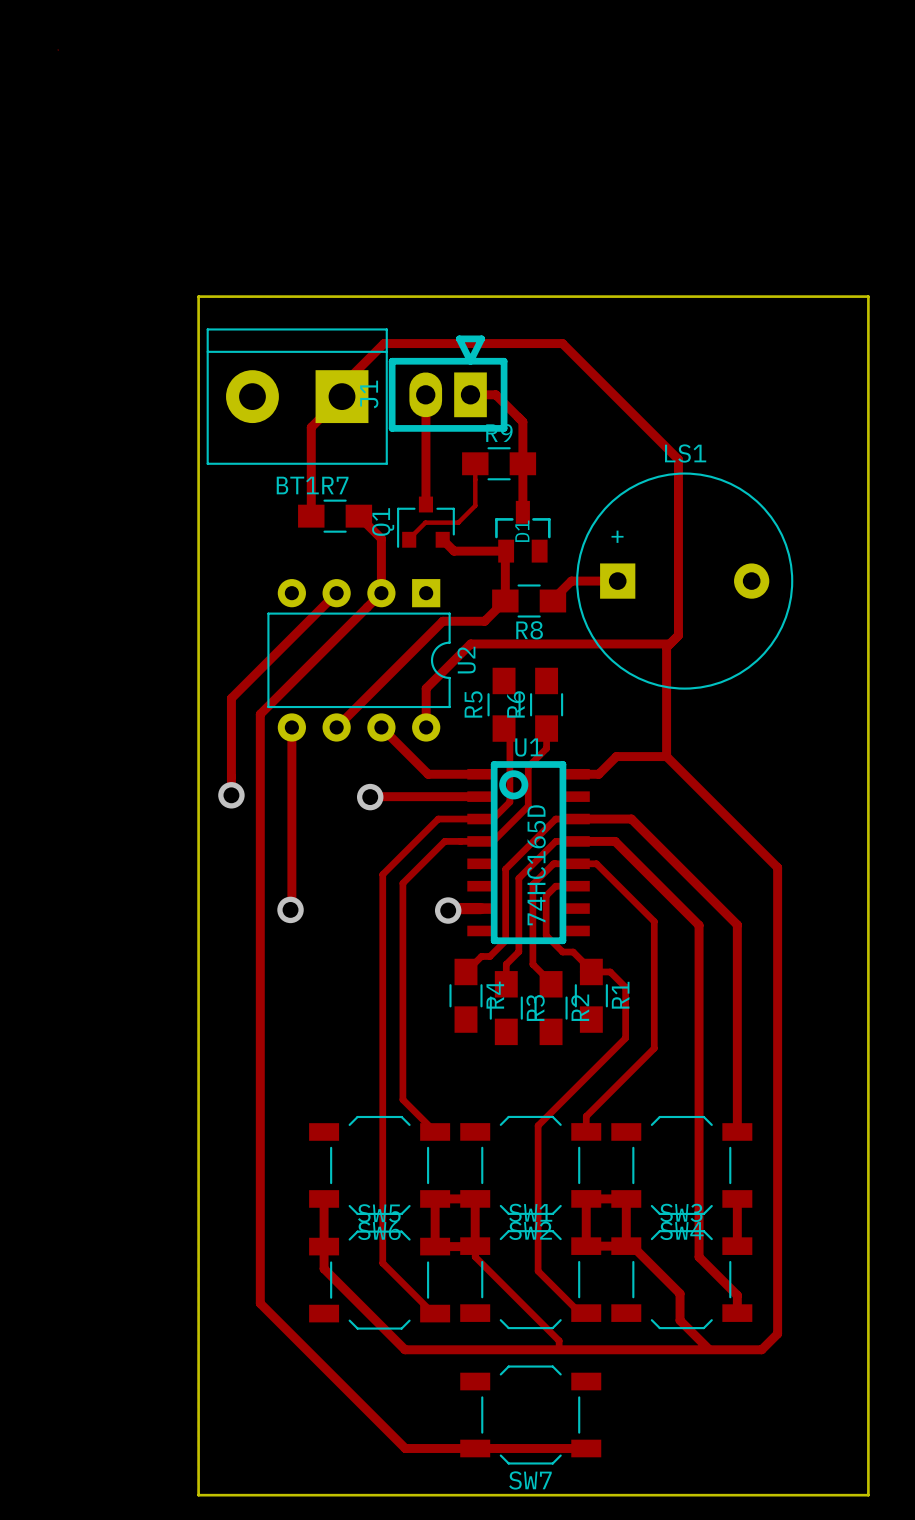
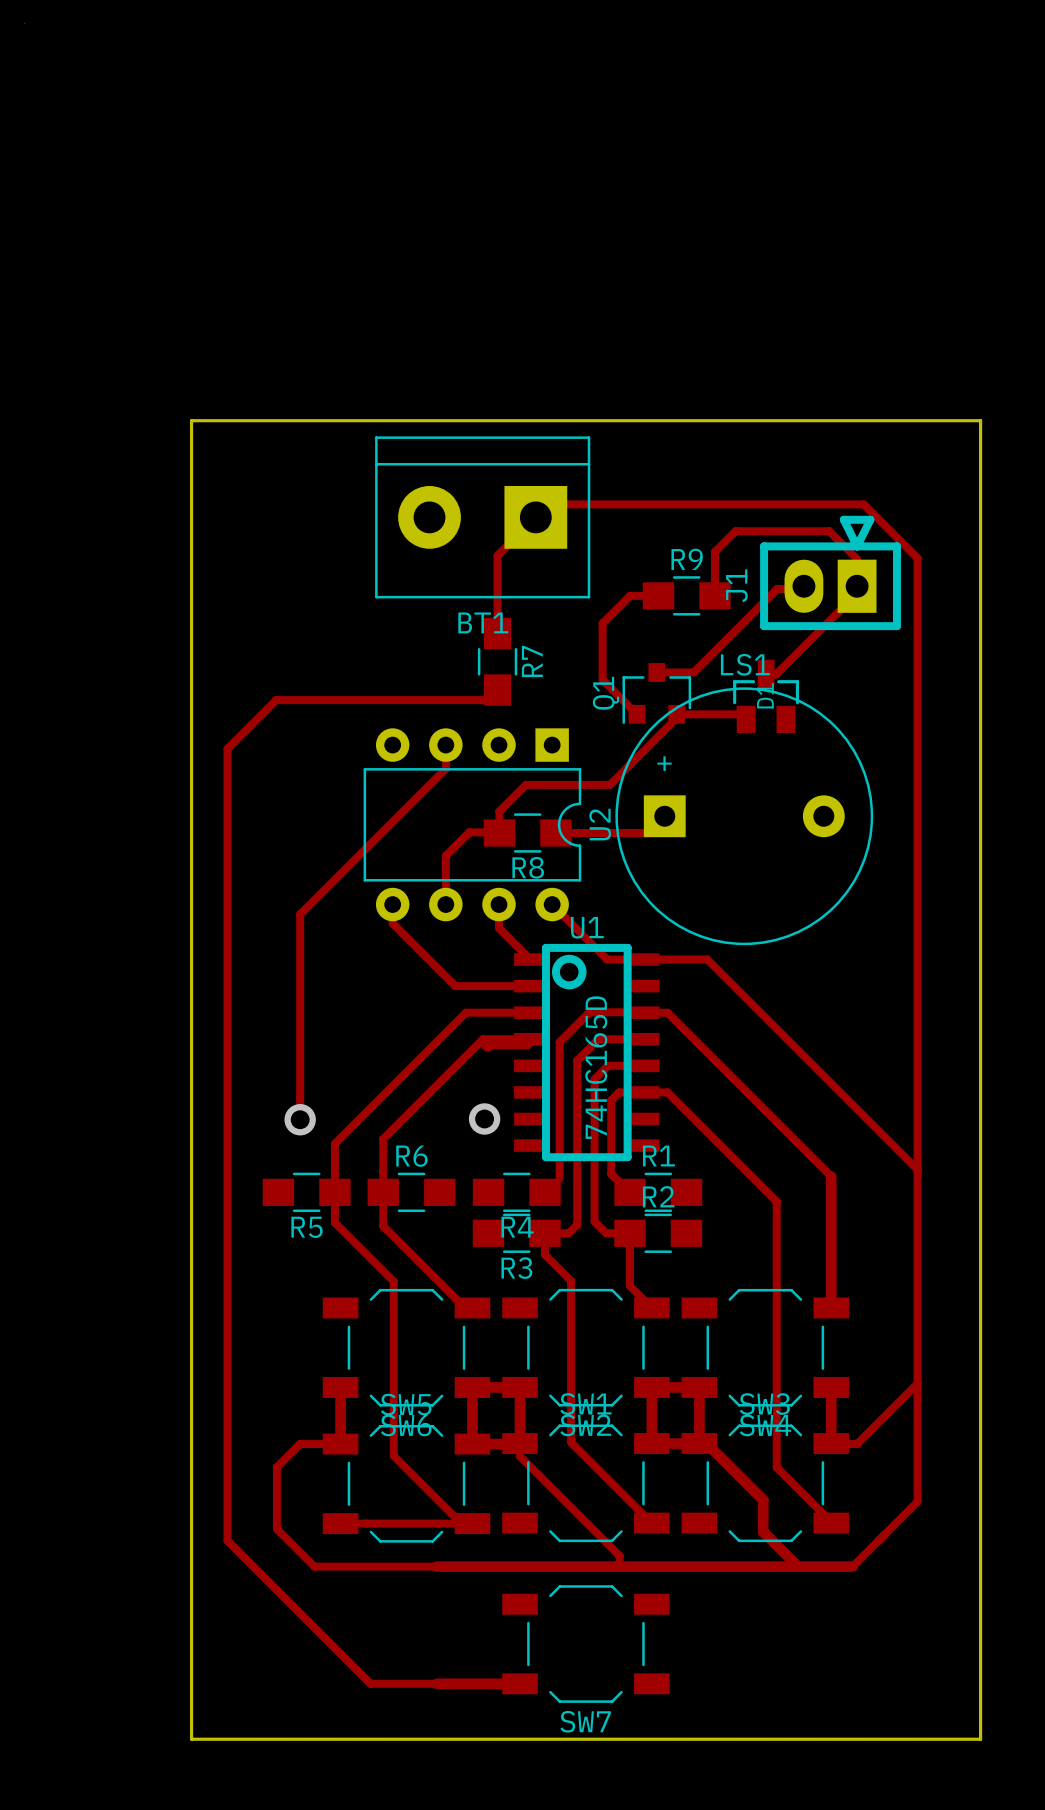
track: (344, 383) (384, 343) (562, 343) (678, 459) (678, 635) (666, 647) (666, 756) -> none
J1 position: (448, 383) -> (830, 572)
board edge: (198, 384) (198, 296) (868, 296) (868, 1495) (863, 1495) -> (191, 420) (980, 420) (980, 1739)
track: (470, 394) (495, 394) (522, 421) (522, 512) -> none
track: (425, 395) (425, 504) -> none
BT1 position: (297, 396) -> (482, 517)
track: (342, 396) (311, 427) (311, 516) -> none
track: (475, 463) (475, 505) (458, 522) (425, 522) (409, 539) -> none
R9 position: (499, 463) -> (686, 595)
R7 rotation: 0° (335, 516) -> 90° clockwise (497, 661)
R7 position: (335, 516) -> (497, 661)
track: (358, 516) (381, 538) (381, 593) (260, 714) (260, 1303) (405, 1448) -> (499, 691) (490, 700) (276, 700) (227, 748) (227, 1540) (370, 1683) (437, 1683)
Q1 position: (425, 522) -> (656, 693)
track: none -> (806, 588) (777, 588) (693, 672) (656, 672)
D1 position: (522, 531) -> (766, 696)
track: none -> (658, 595) (630, 595) (602, 623) (602, 680) (636, 714)
track: none -> (714, 595) (714, 551) (735, 531) (829, 531) (857, 559) (857, 593) (775, 674) (765, 674)
track: (442, 539) (454, 551) (506, 551) (505, 600) (484, 621) (442, 621) (336, 727) -> none
track: (617, 581) (571, 581) (551, 600) -> none
LS1 position: (684, 581) -> (744, 816)
track: (336, 593) (231, 698) (231, 795) -> none
R8 position: (529, 600) -> (527, 833)
track: none -> (745, 719) (740, 714) (676, 714) (676, 718) (609, 784) (525, 784) (499, 811) (499, 833) (508, 833)
track: (669, 643) (470, 643) (426, 688) (426, 727) -> none
track: none -> (446, 746) (446, 768) (300, 914) (300, 1119)
U2 position: (359, 660) -> (472, 824)
R5 name position: R5 (473, 704) -> R5 (307, 1227)
R5 rotation: 0° (504, 704) -> 90° clockwise (306, 1192)
R5 position: (504, 704) -> (306, 1192)
R6 rotation: 0° (546, 704) -> 90° clockwise (411, 1192)
R6 position: (546, 704) -> (411, 1192)
track: none -> (664, 816) (648, 833) (555, 833)
track: (291, 727) (290, 909) -> none
track: (381, 727) (428, 774) (480, 774) -> none
track: (504, 728) (509, 734) (509, 802) (492, 819) (438, 819) (382, 874) (382, 1263) (433, 1313) -> (340, 1523) (470, 1523)
track: (546, 728) (546, 748) (528, 766) (528, 806) (493, 841) (444, 841) (402, 883) (402, 1099) (435, 1131) -> (530, 1039) (483, 1039) (383, 1138) (383, 1226) (465, 1307) (472, 1307)
track: none -> (500, 832) (469, 832) (445, 855) (445, 904)
track: (666, 756) (777, 867) (777, 1333) (761, 1349) (755, 1349) -> (497, 633) (497, 555) (548, 504) (863, 504) (917, 558) (917, 1501) (852, 1566)
track: (666, 756) (616, 756) (598, 774) (576, 774) -> none
track: none -> (392, 904) (392, 923) (455, 986) (530, 986)
track: none -> (499, 904) (499, 928) (530, 959)
track: none -> (552, 904) (607, 959) (707, 959) (917, 1169)
via: (231, 795) -> none
track: (480, 796) (370, 797) -> none
via: (370, 797) -> none
track: (576, 819) (631, 819) (737, 924) (737, 1021) -> (643, 1012) (667, 1012) (831, 1176)
track: (584, 819) (555, 819) (505, 869) (505, 940) (489, 956) (481, 956) (466, 971) -> none
U1 position: (528, 852) -> (586, 1052)
track: none -> (643, 1012) (589, 1012) (559, 1042) (559, 1178)
track: none -> (530, 1012) (466, 1012) (334, 1143) (334, 1222) (393, 1281) (393, 1455) (461, 1523)
track: (576, 886) (555, 886) (546, 895) (546, 935) (562, 952) (573, 952) (591, 971) -> none
via position: (290, 909) -> (300, 1119)
via position: (448, 910) -> (484, 1118)
track: none -> (643, 1065) (607, 1065) (594, 1079) (594, 1221) (606, 1233) (629, 1233) (629, 1286) (651, 1307) (655, 1307)
track: (583, 971) (610, 971) (625, 987) (625, 1038) (538, 1125) (538, 1271) (580, 1313) (586, 1313) -> (643, 1039) (598, 1039) (577, 1060) (577, 1224) (568, 1233) (544, 1233) (544, 1254) (571, 1280) (571, 1442) (651, 1523)
track: (506, 984) (506, 964) (518, 951) (518, 878) (555, 841) (615, 841) (699, 925) (699, 1257) (737, 1295) (737, 1313) -> (629, 1192) (611, 1173) (611, 1100) (619, 1092) (667, 1092) (776, 1201) (776, 1467) (831, 1523)
track: (551, 984) (532, 964) (532, 884) (553, 863) (596, 863) (654, 921) (654, 1048) (586, 1116) (586, 1131) -> none
R4 rotation: 0° (466, 995) -> 90° clockwise (516, 1192)
R1 rotation: 0° (591, 995) -> 90° clockwise (658, 1192)
R1 name position: R1 (620, 995) -> R1 (658, 1155)
R2 name position: R2 (580, 1007) -> R2 (658, 1196)
R3 rotation: 0° (506, 1008) -> 90° clockwise (516, 1233)
R3 position: (506, 1008) -> (516, 1233)
R2 rotation: 0° (551, 1008) -> 90° clockwise (658, 1233)
R2 position: (551, 1008) -> (658, 1233)
track: none -> (917, 1383) (857, 1444) (831, 1444)
track: (324, 1246) (324, 1268) (405, 1349) -> (340, 1444) (300, 1444) (276, 1467) (276, 1529) (314, 1566) (436, 1566)
track: (475, 1448) (586, 1448) -> none

